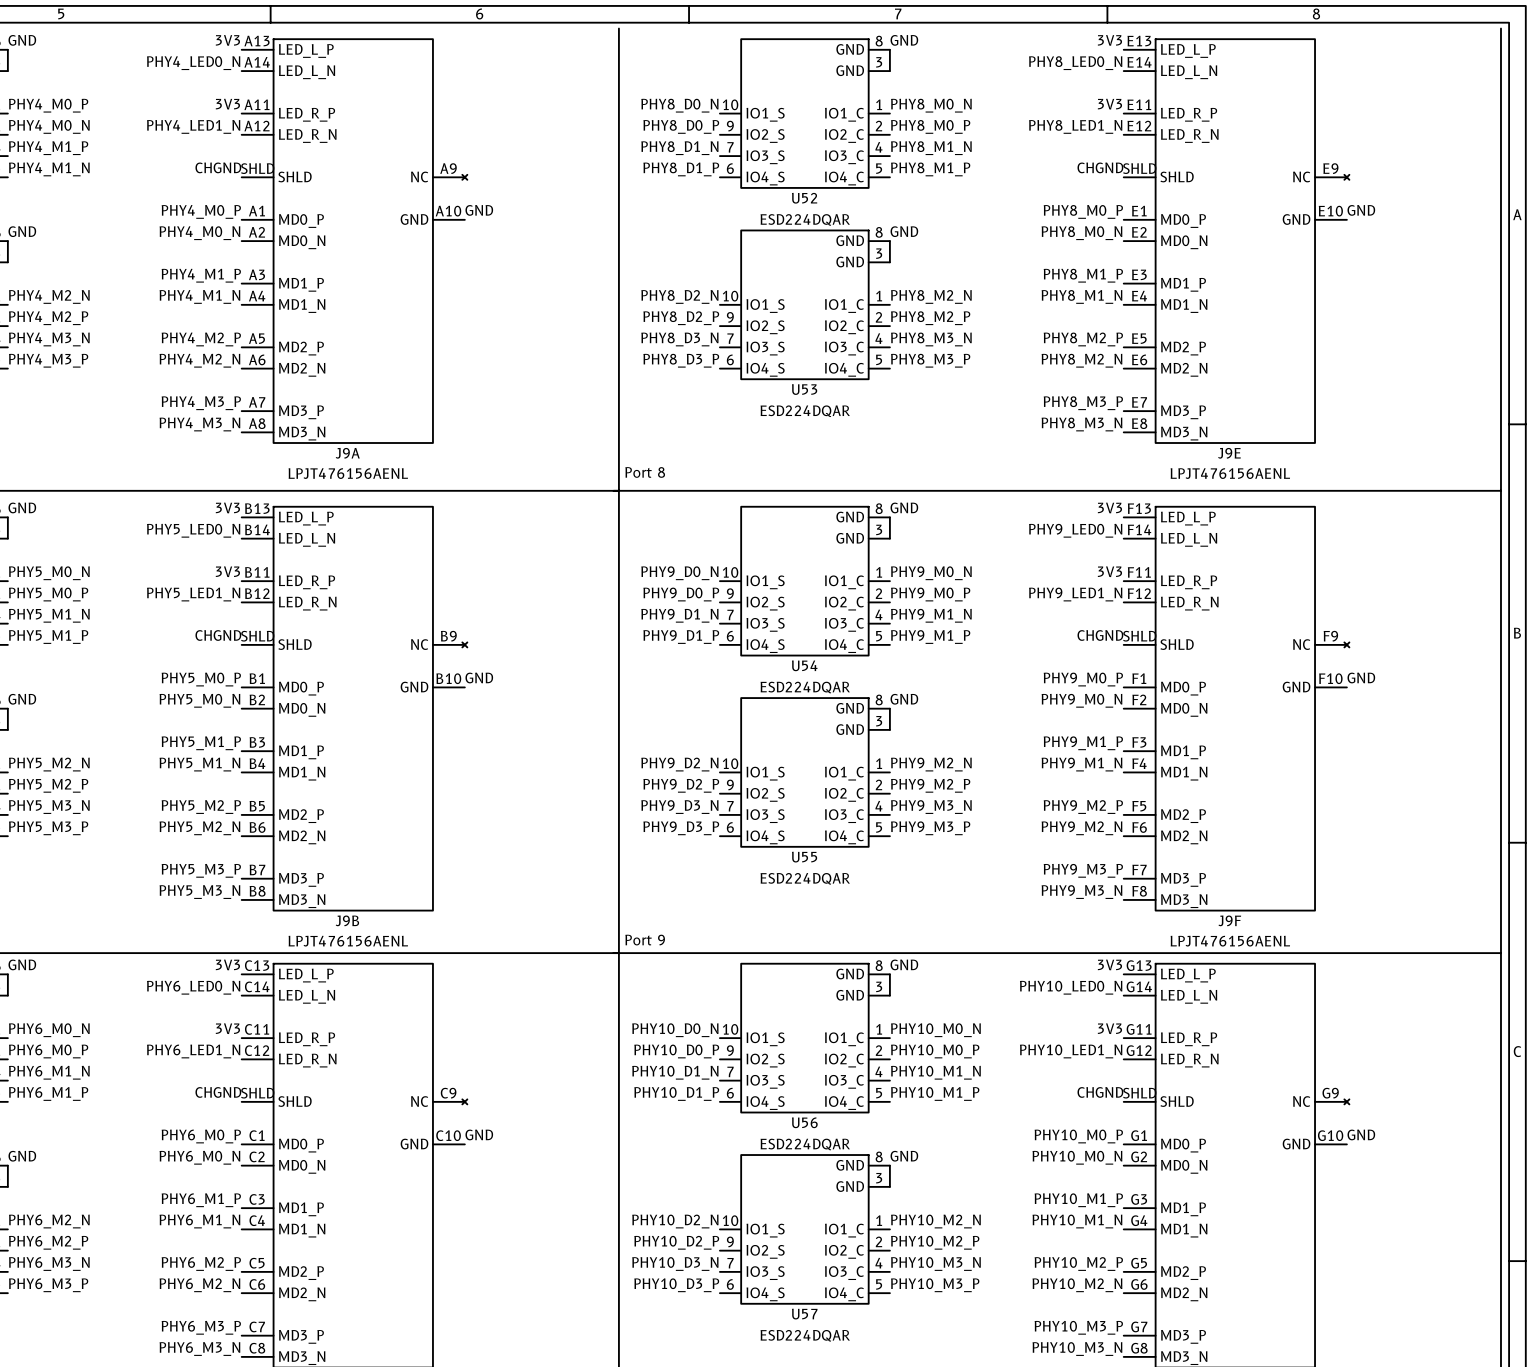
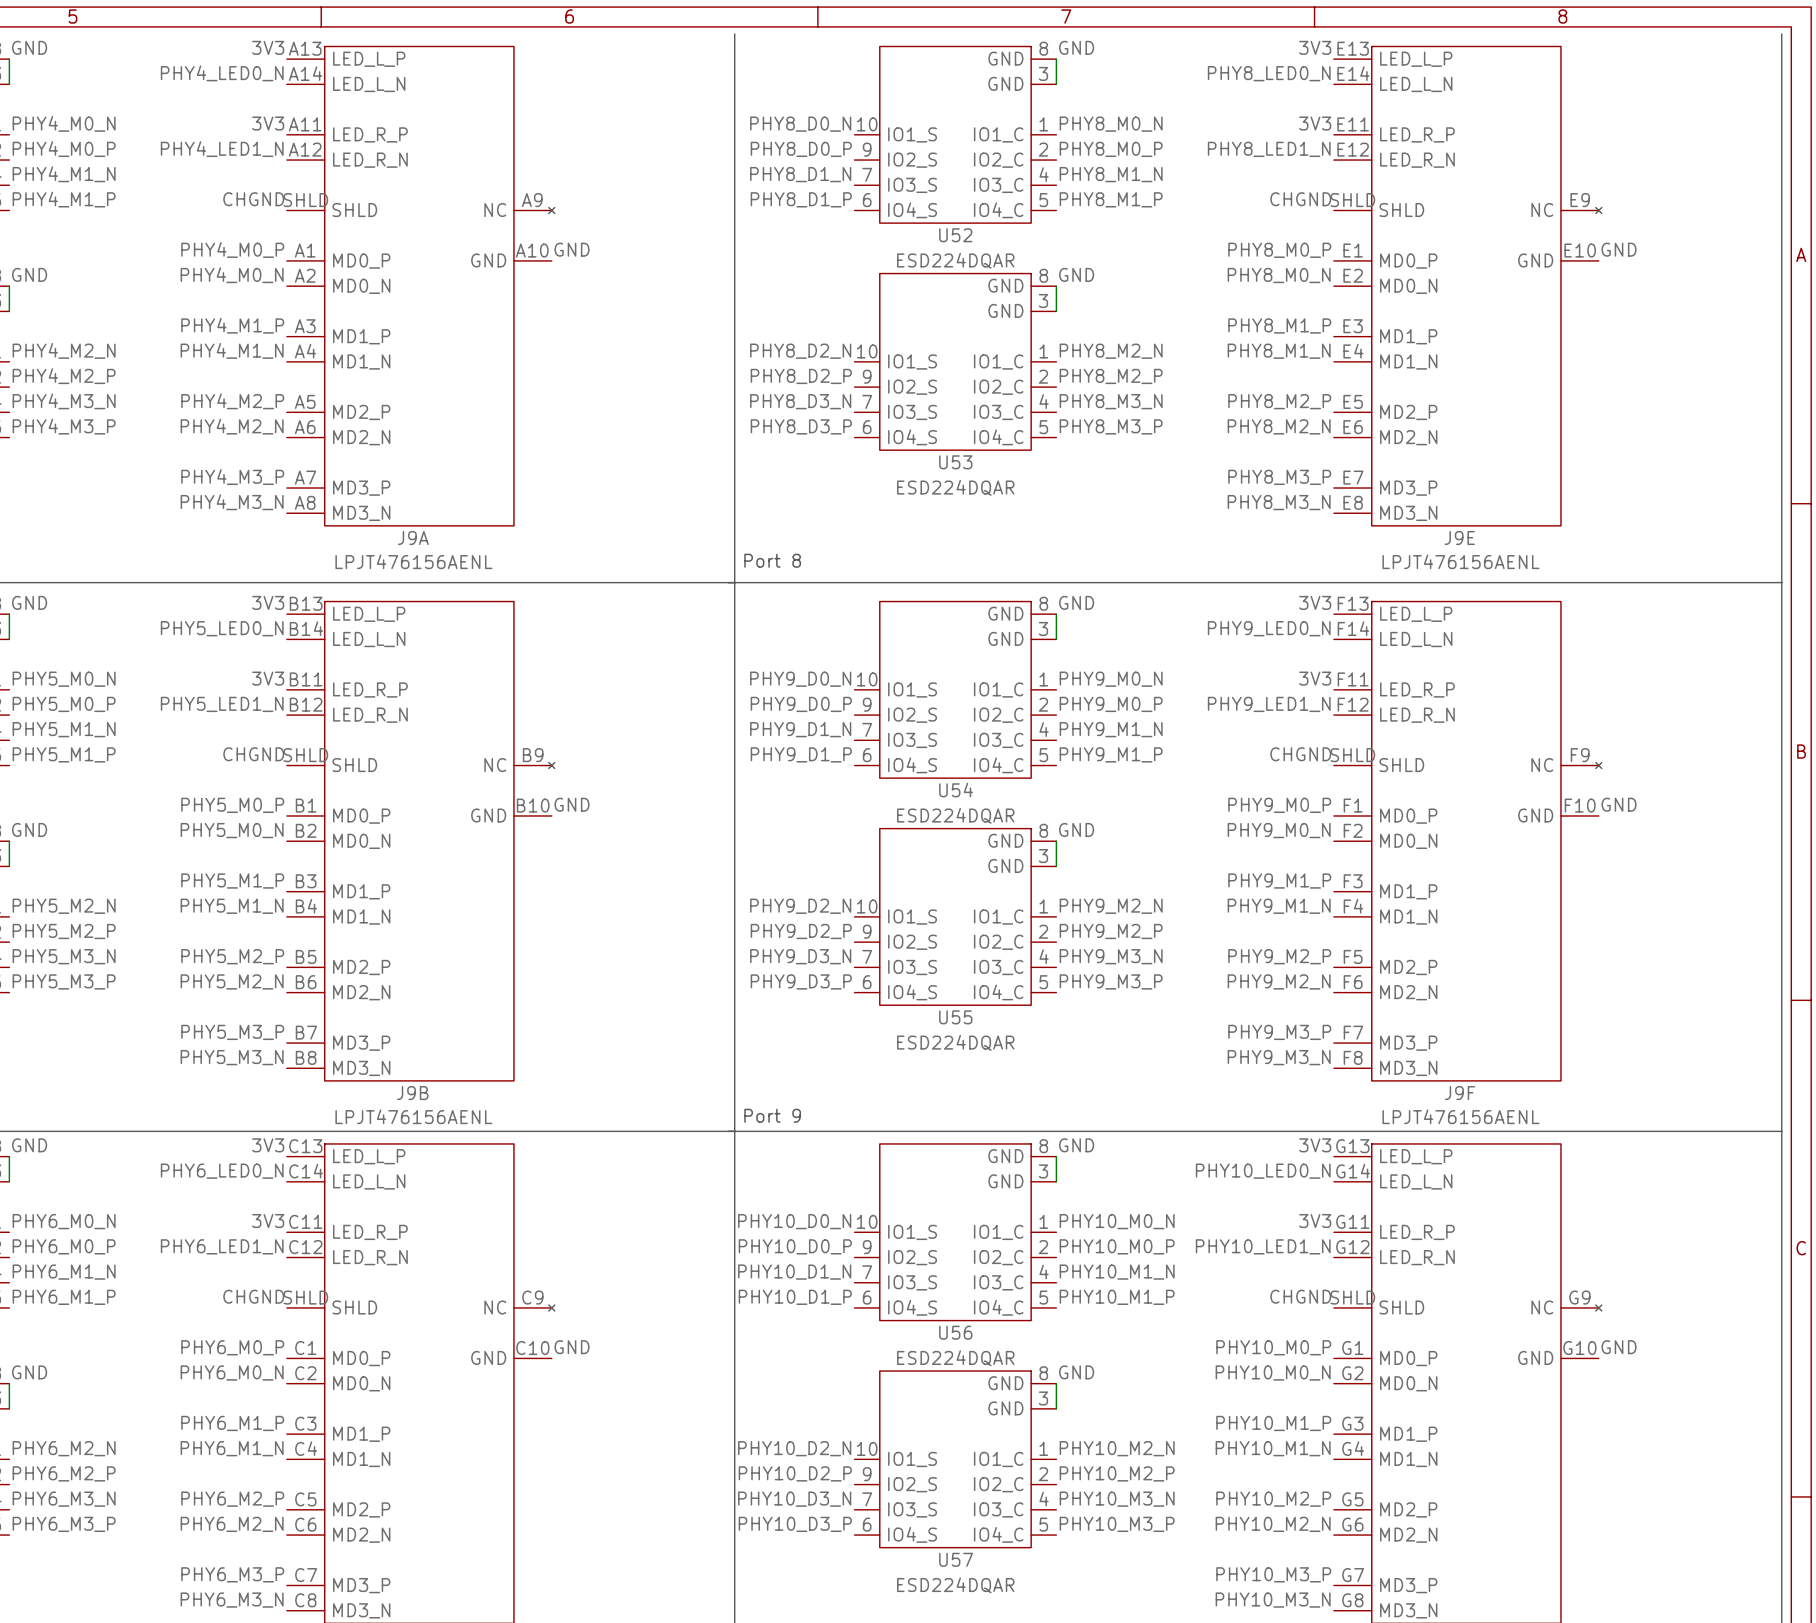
label: PHY4_M0_P (48, 105) -> PHY4_M0_N (64, 123)
label: PHY4_M0_N (49, 126) -> PHY4_M0_P (64, 149)
label: PHY4_M1_P (48, 148) -> PHY4_M1_N (64, 174)
label: PHY4_M1_N (49, 169) -> PHY4_M1_P (64, 199)

